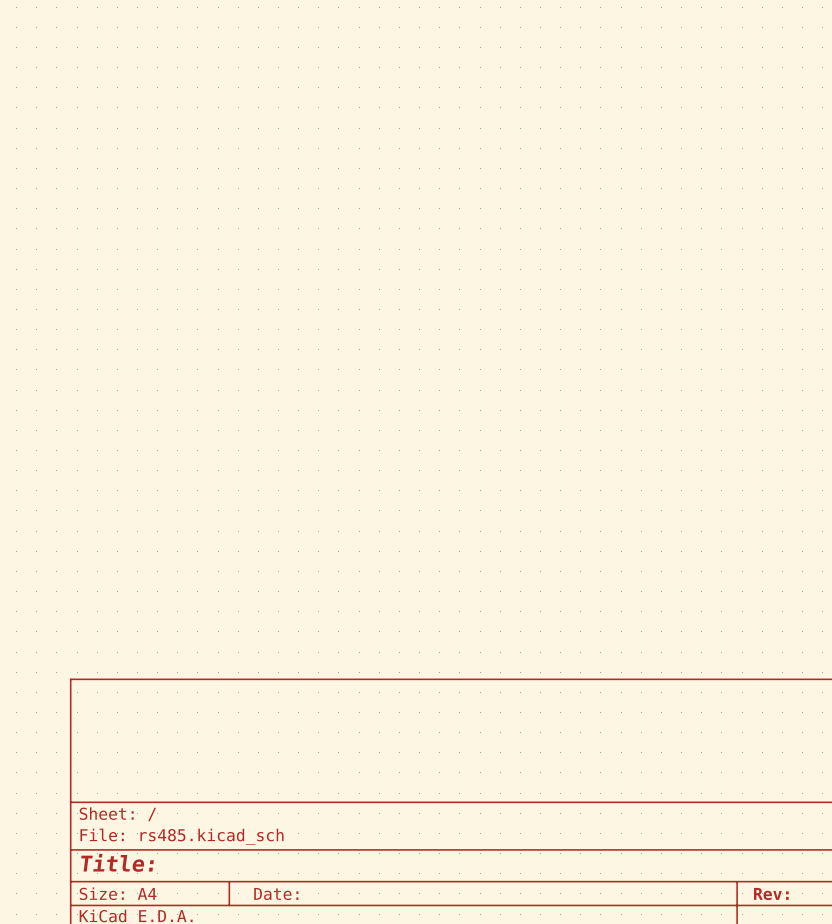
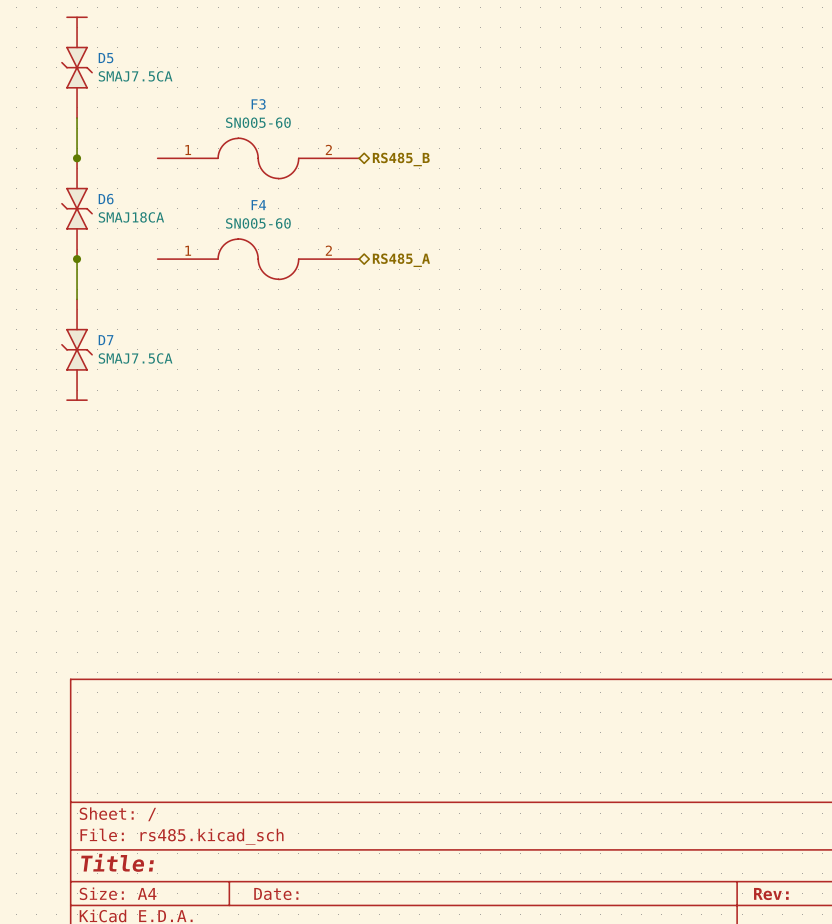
power symbol: none -> (77, 17)
D5: none -> SMAJ7.5CA (77, 67)
wire: none -> (77, 118) (77, 158)
junction: none -> (77, 158)
F3: none -> SN005-60 (258, 158)
hierarchical label: none -> RS485_B (401, 159)
D6: none -> SMAJ18CA (77, 208)
wire: none -> (77, 259) (77, 299)
junction: none -> (77, 259)
F4: none -> SN005-60 (258, 259)
hierarchical label: none -> RS485_A (401, 260)
D7: none -> SMAJ7.5CA (77, 349)
power symbol: none -> (77, 400)

